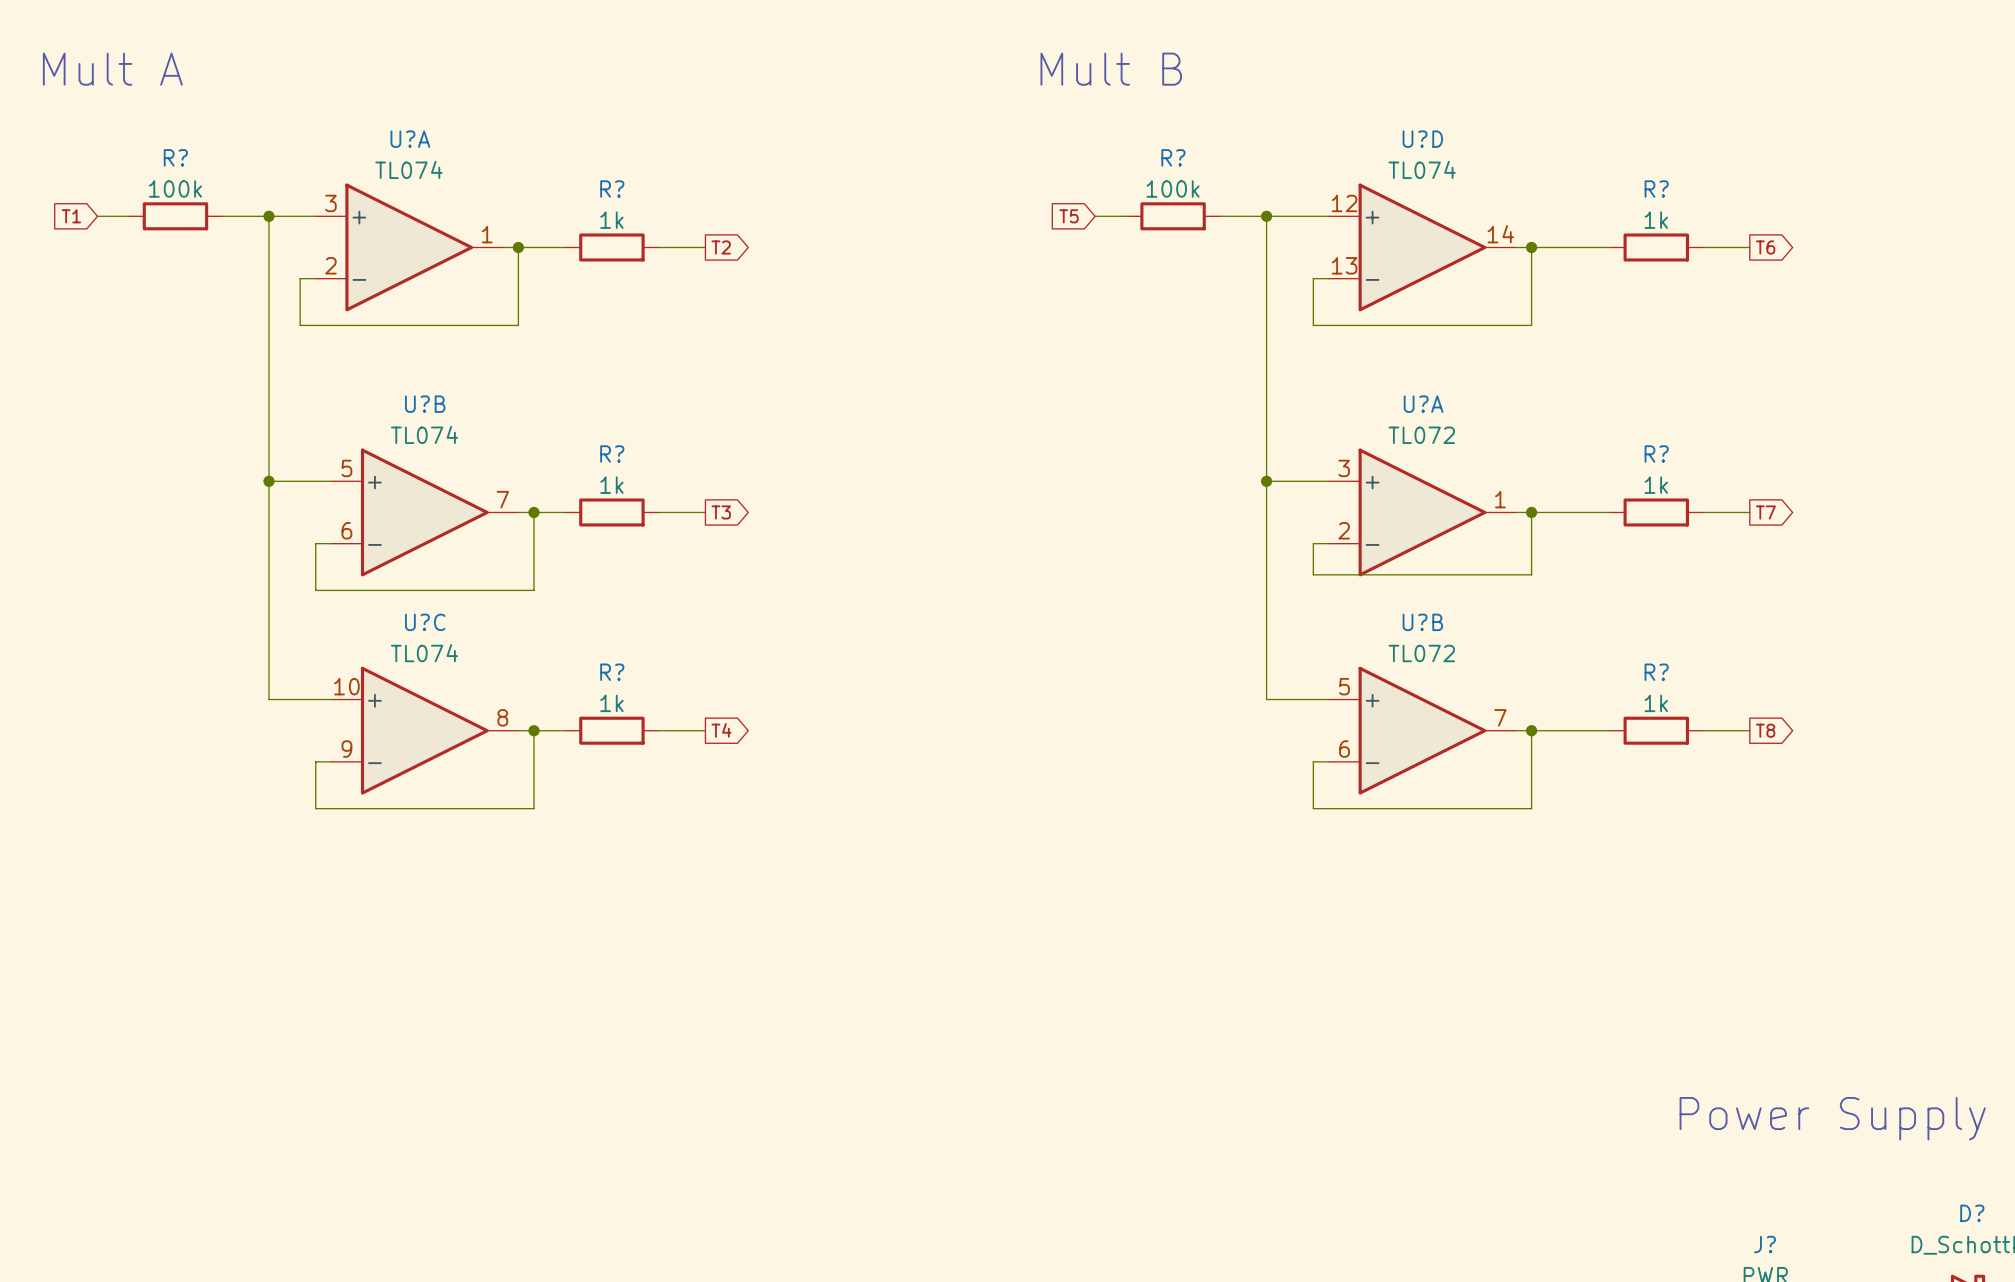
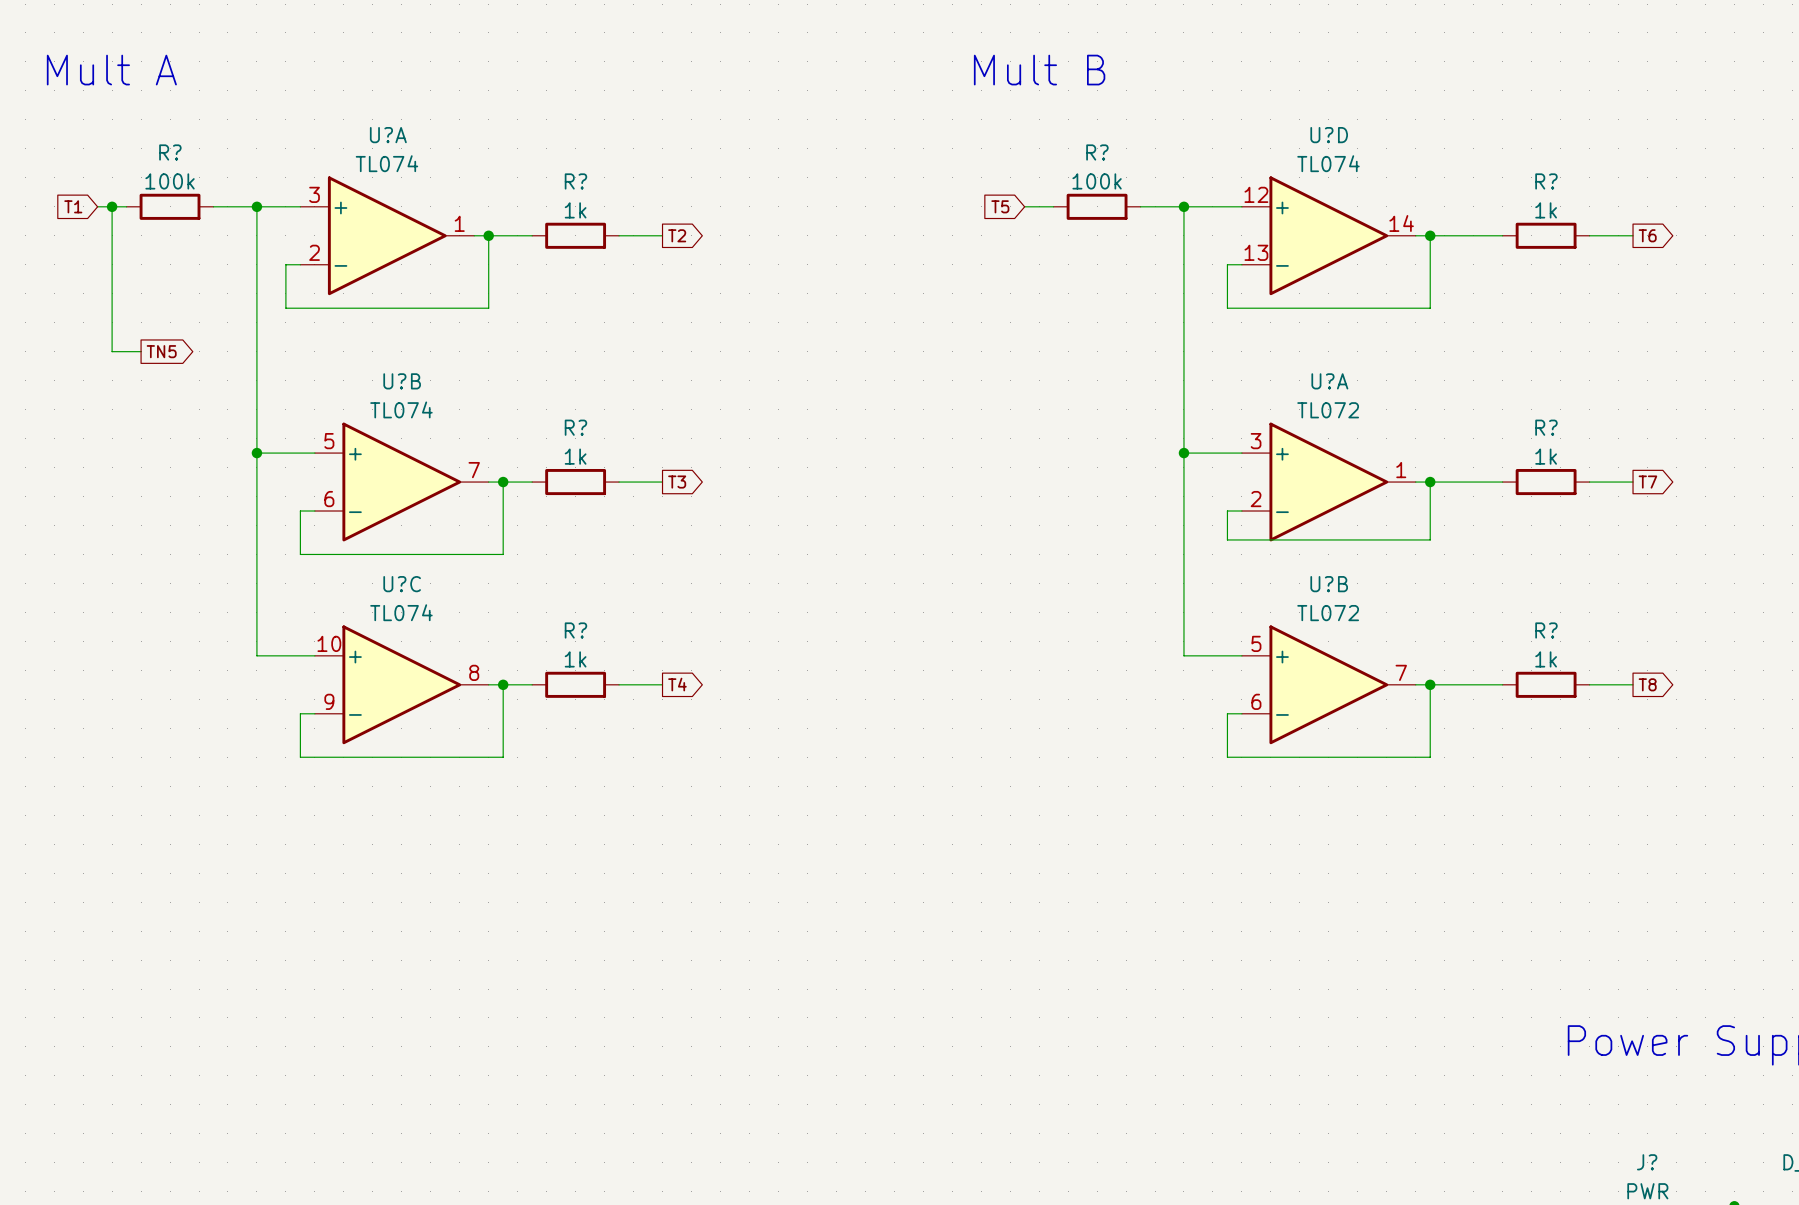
wire: none -> (112, 206) (112, 351) (141, 351)
junction: none -> (112, 206)
global label: none -> TN5 (161, 351)

